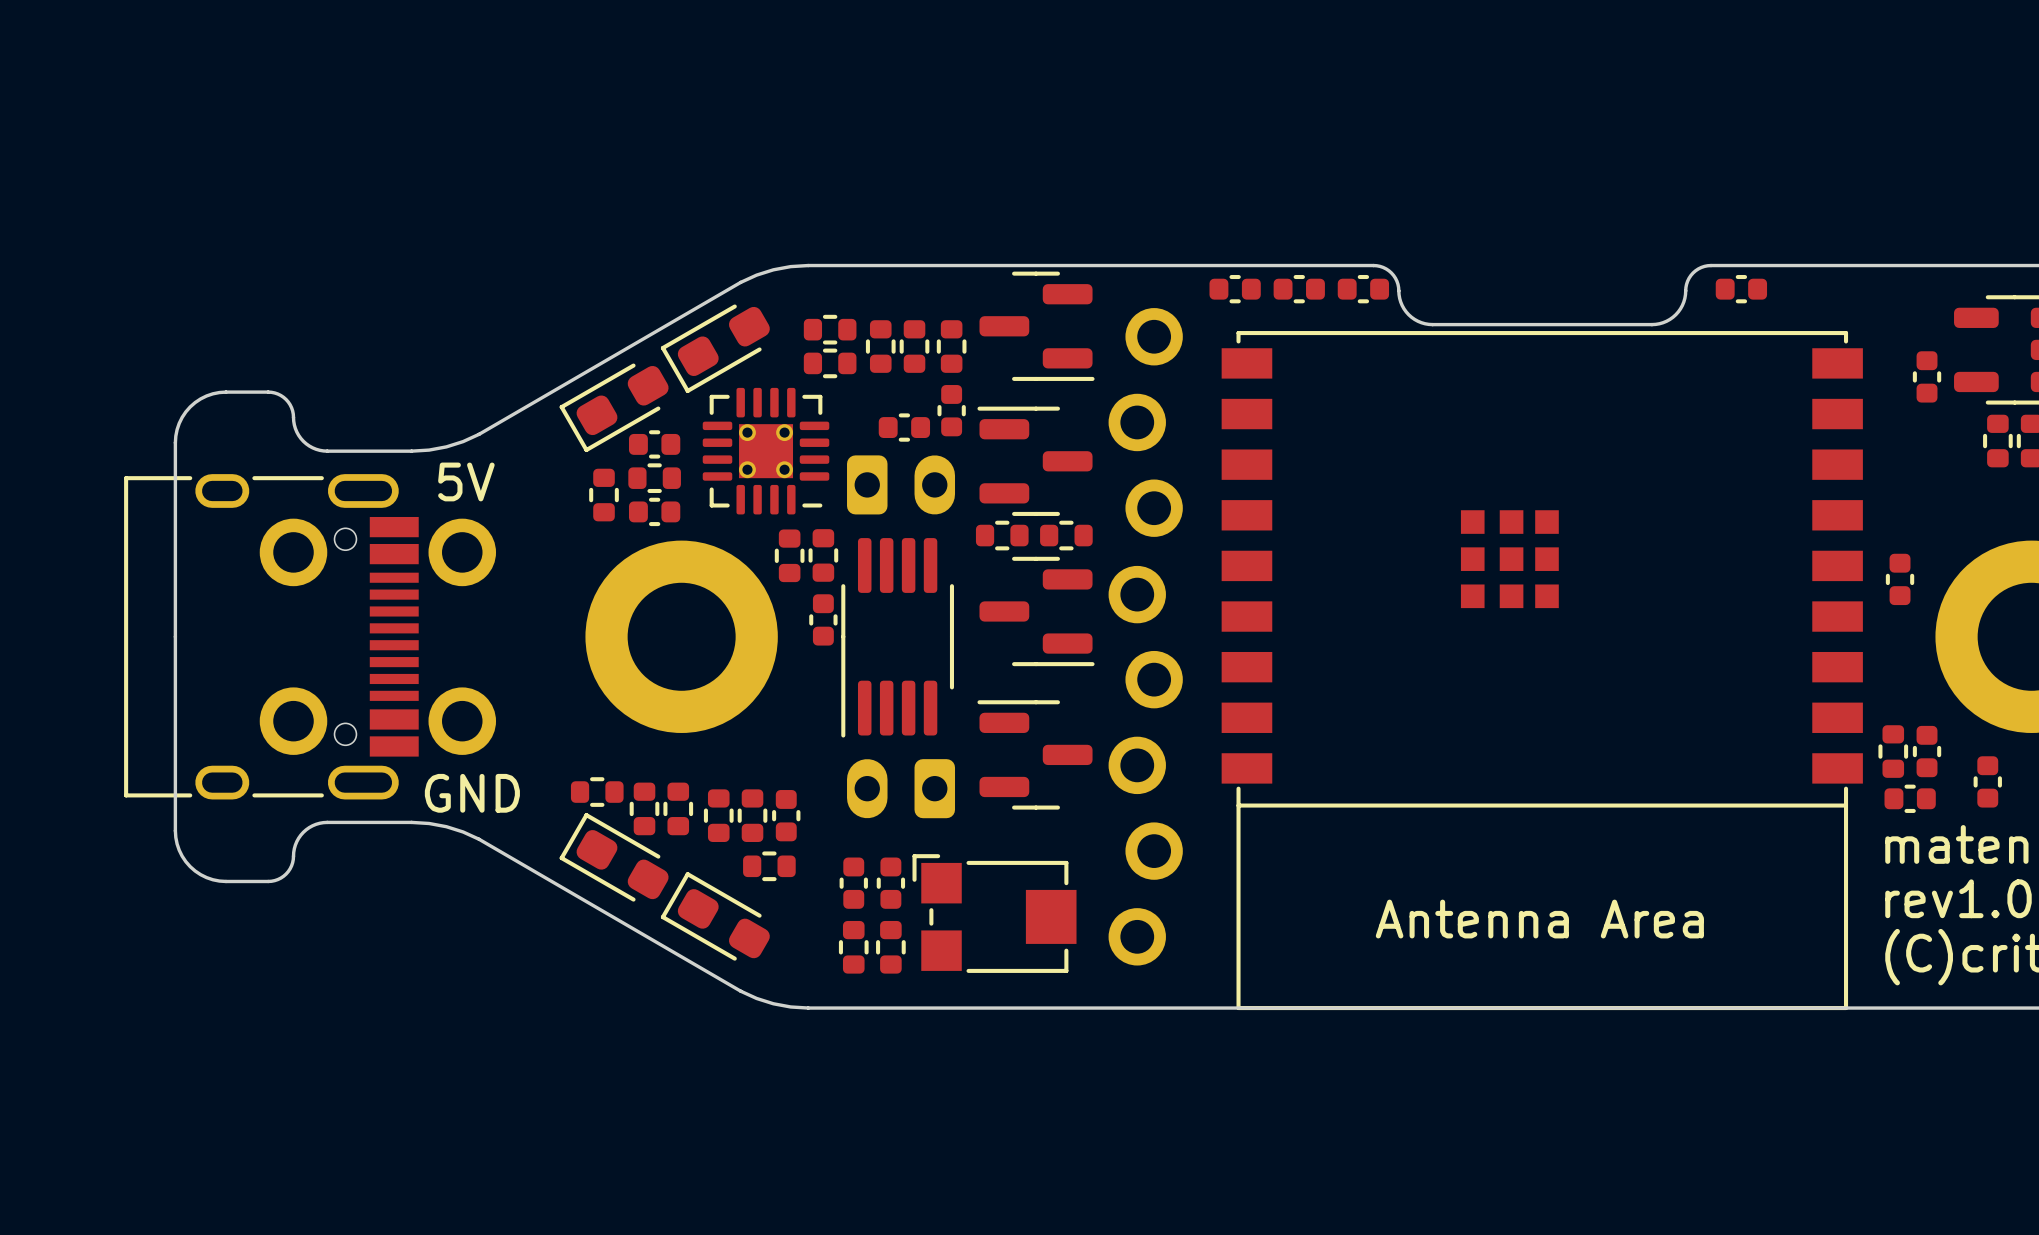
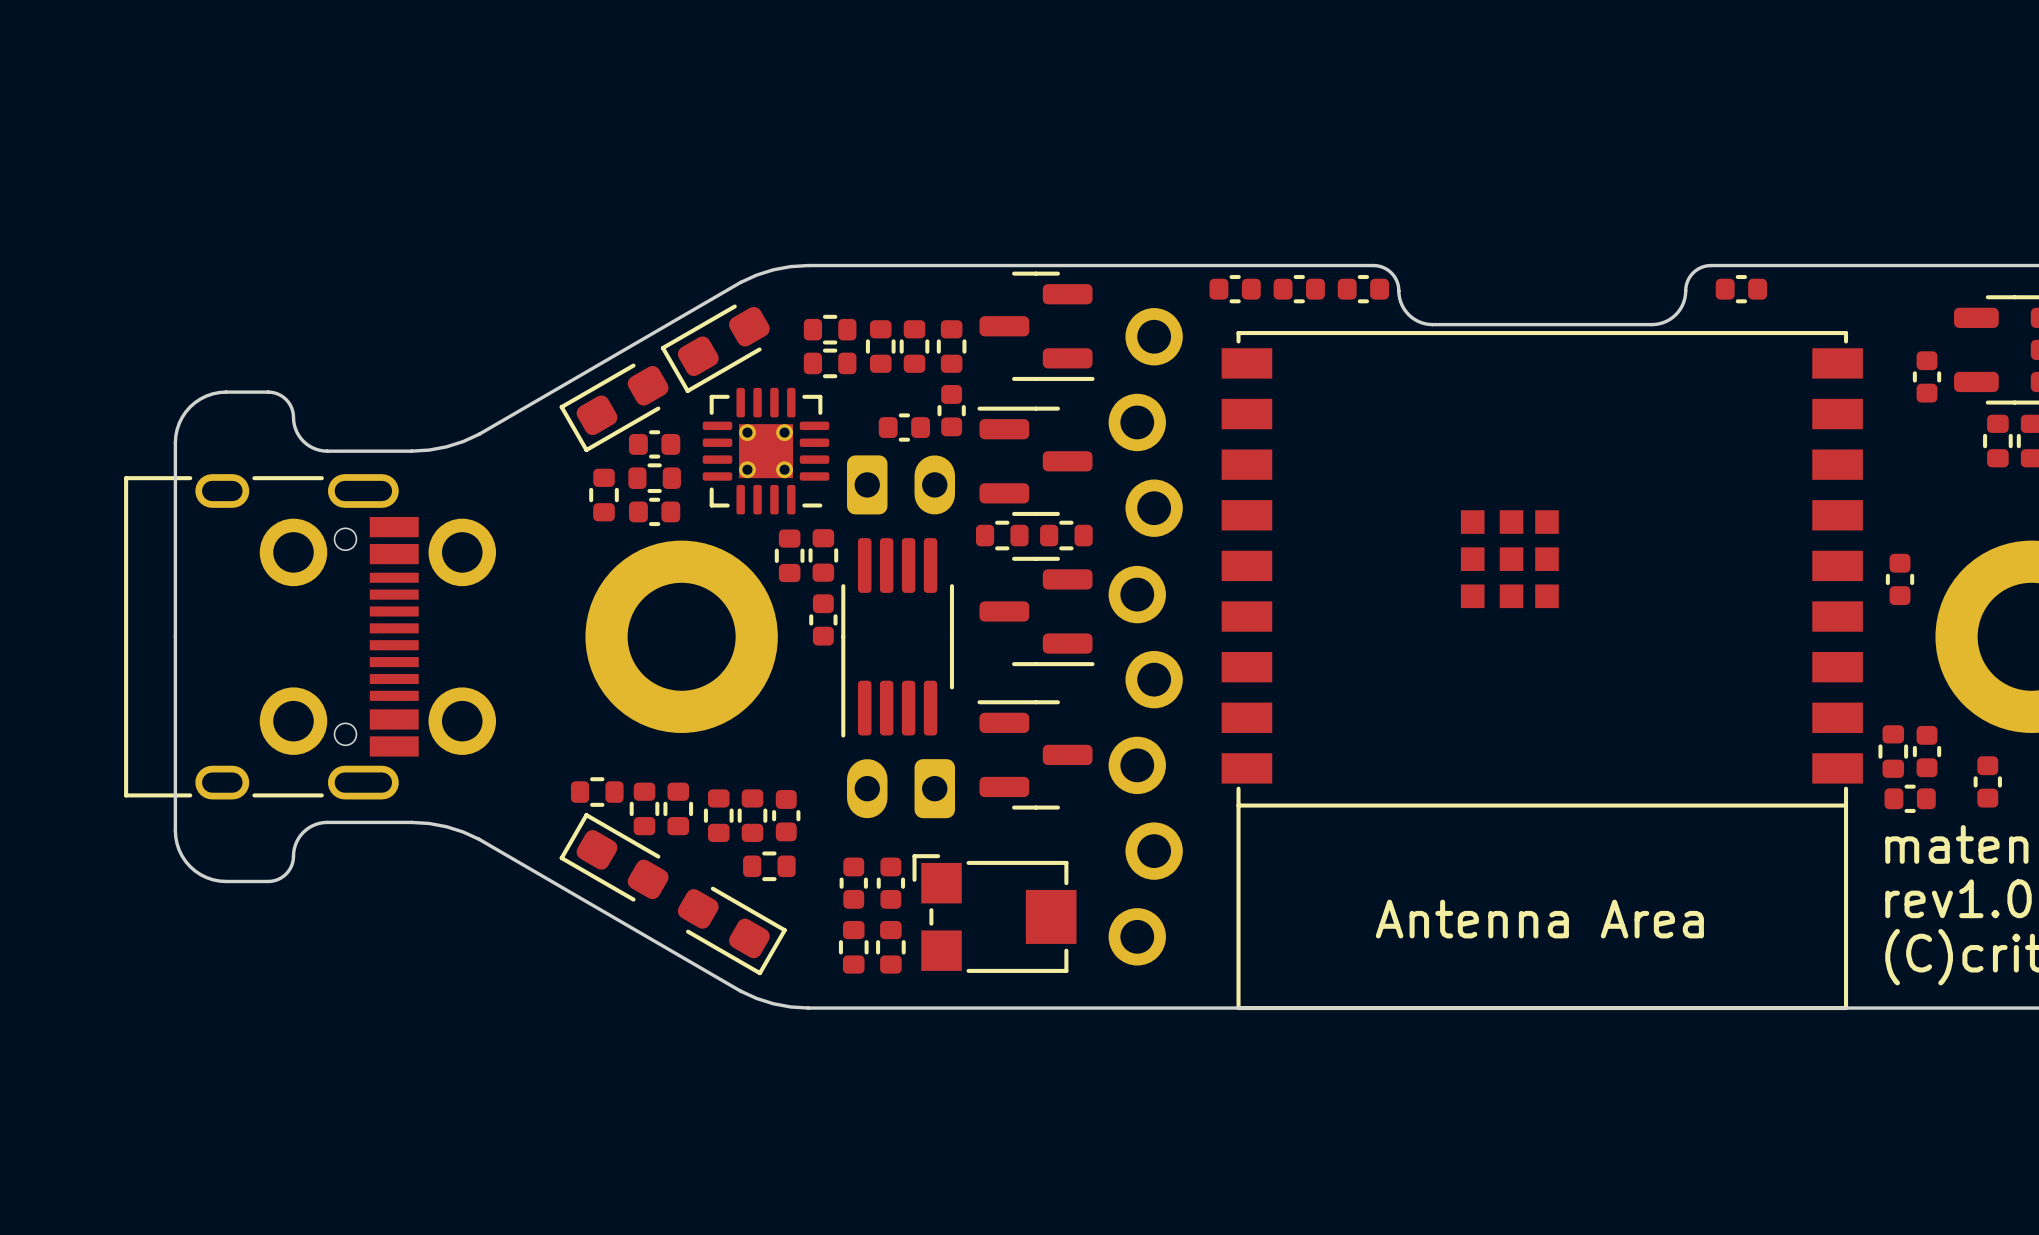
text: 5V (466, 481) -> none
text: GND (472, 793) -> none
part rotation: 0° (715, 916) -> 180° (732, 930)

